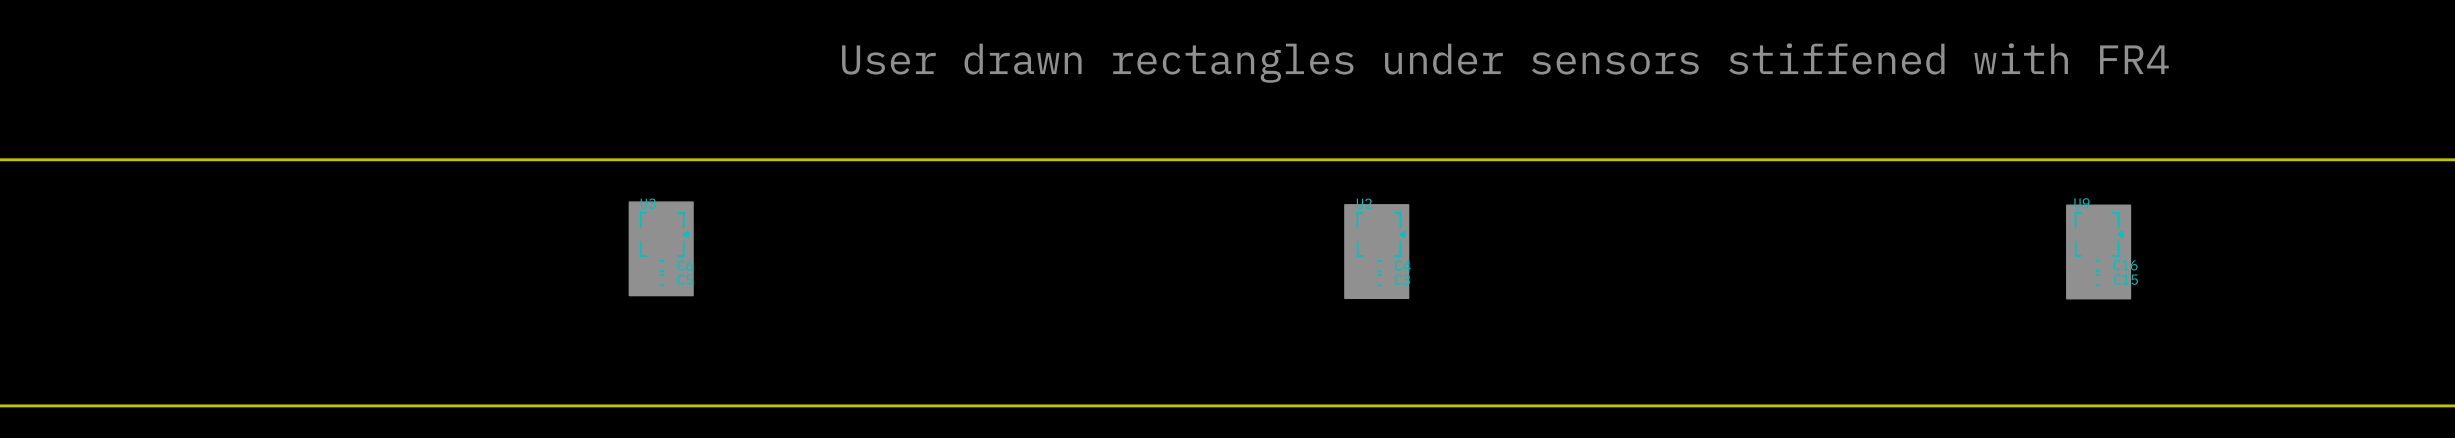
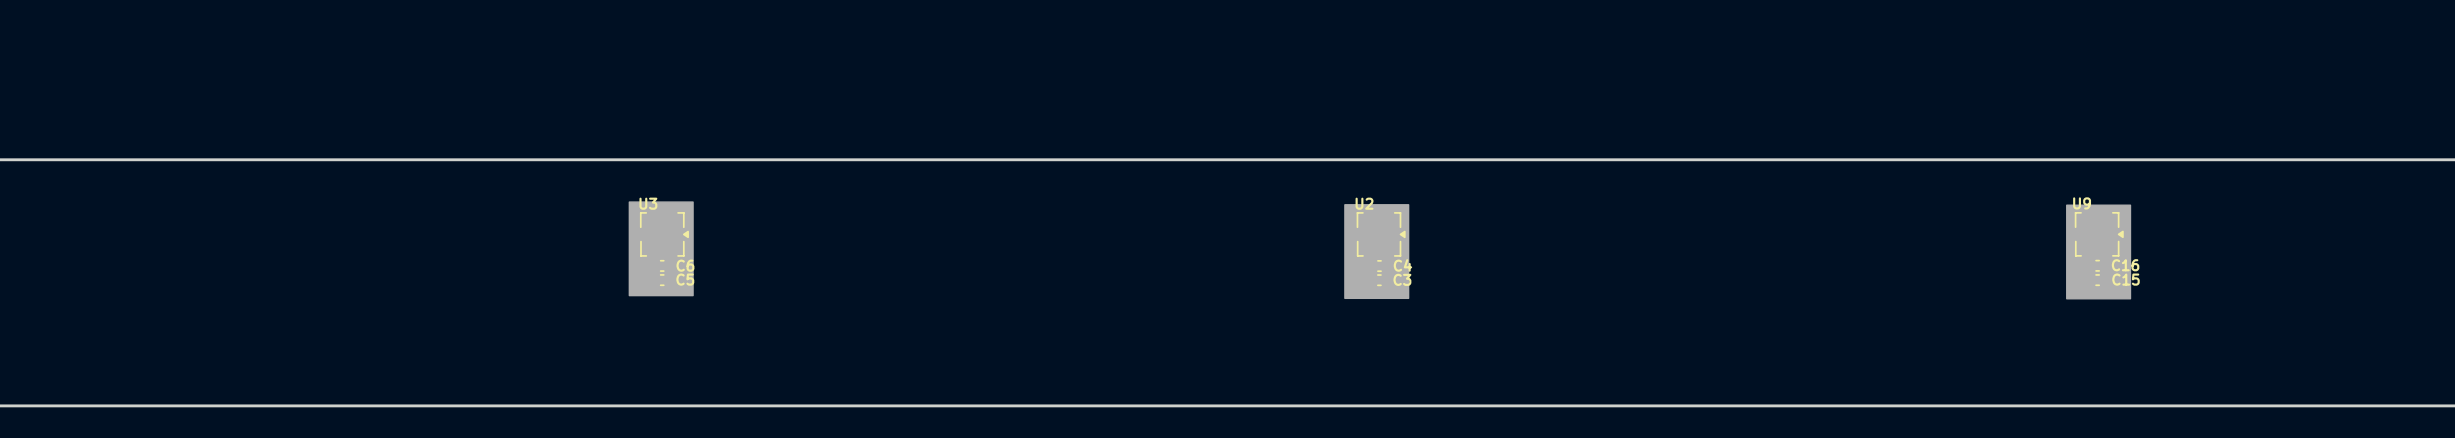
text: User drawn rectangles under sensors stiffened with FR4 (1505, 63) -> none

